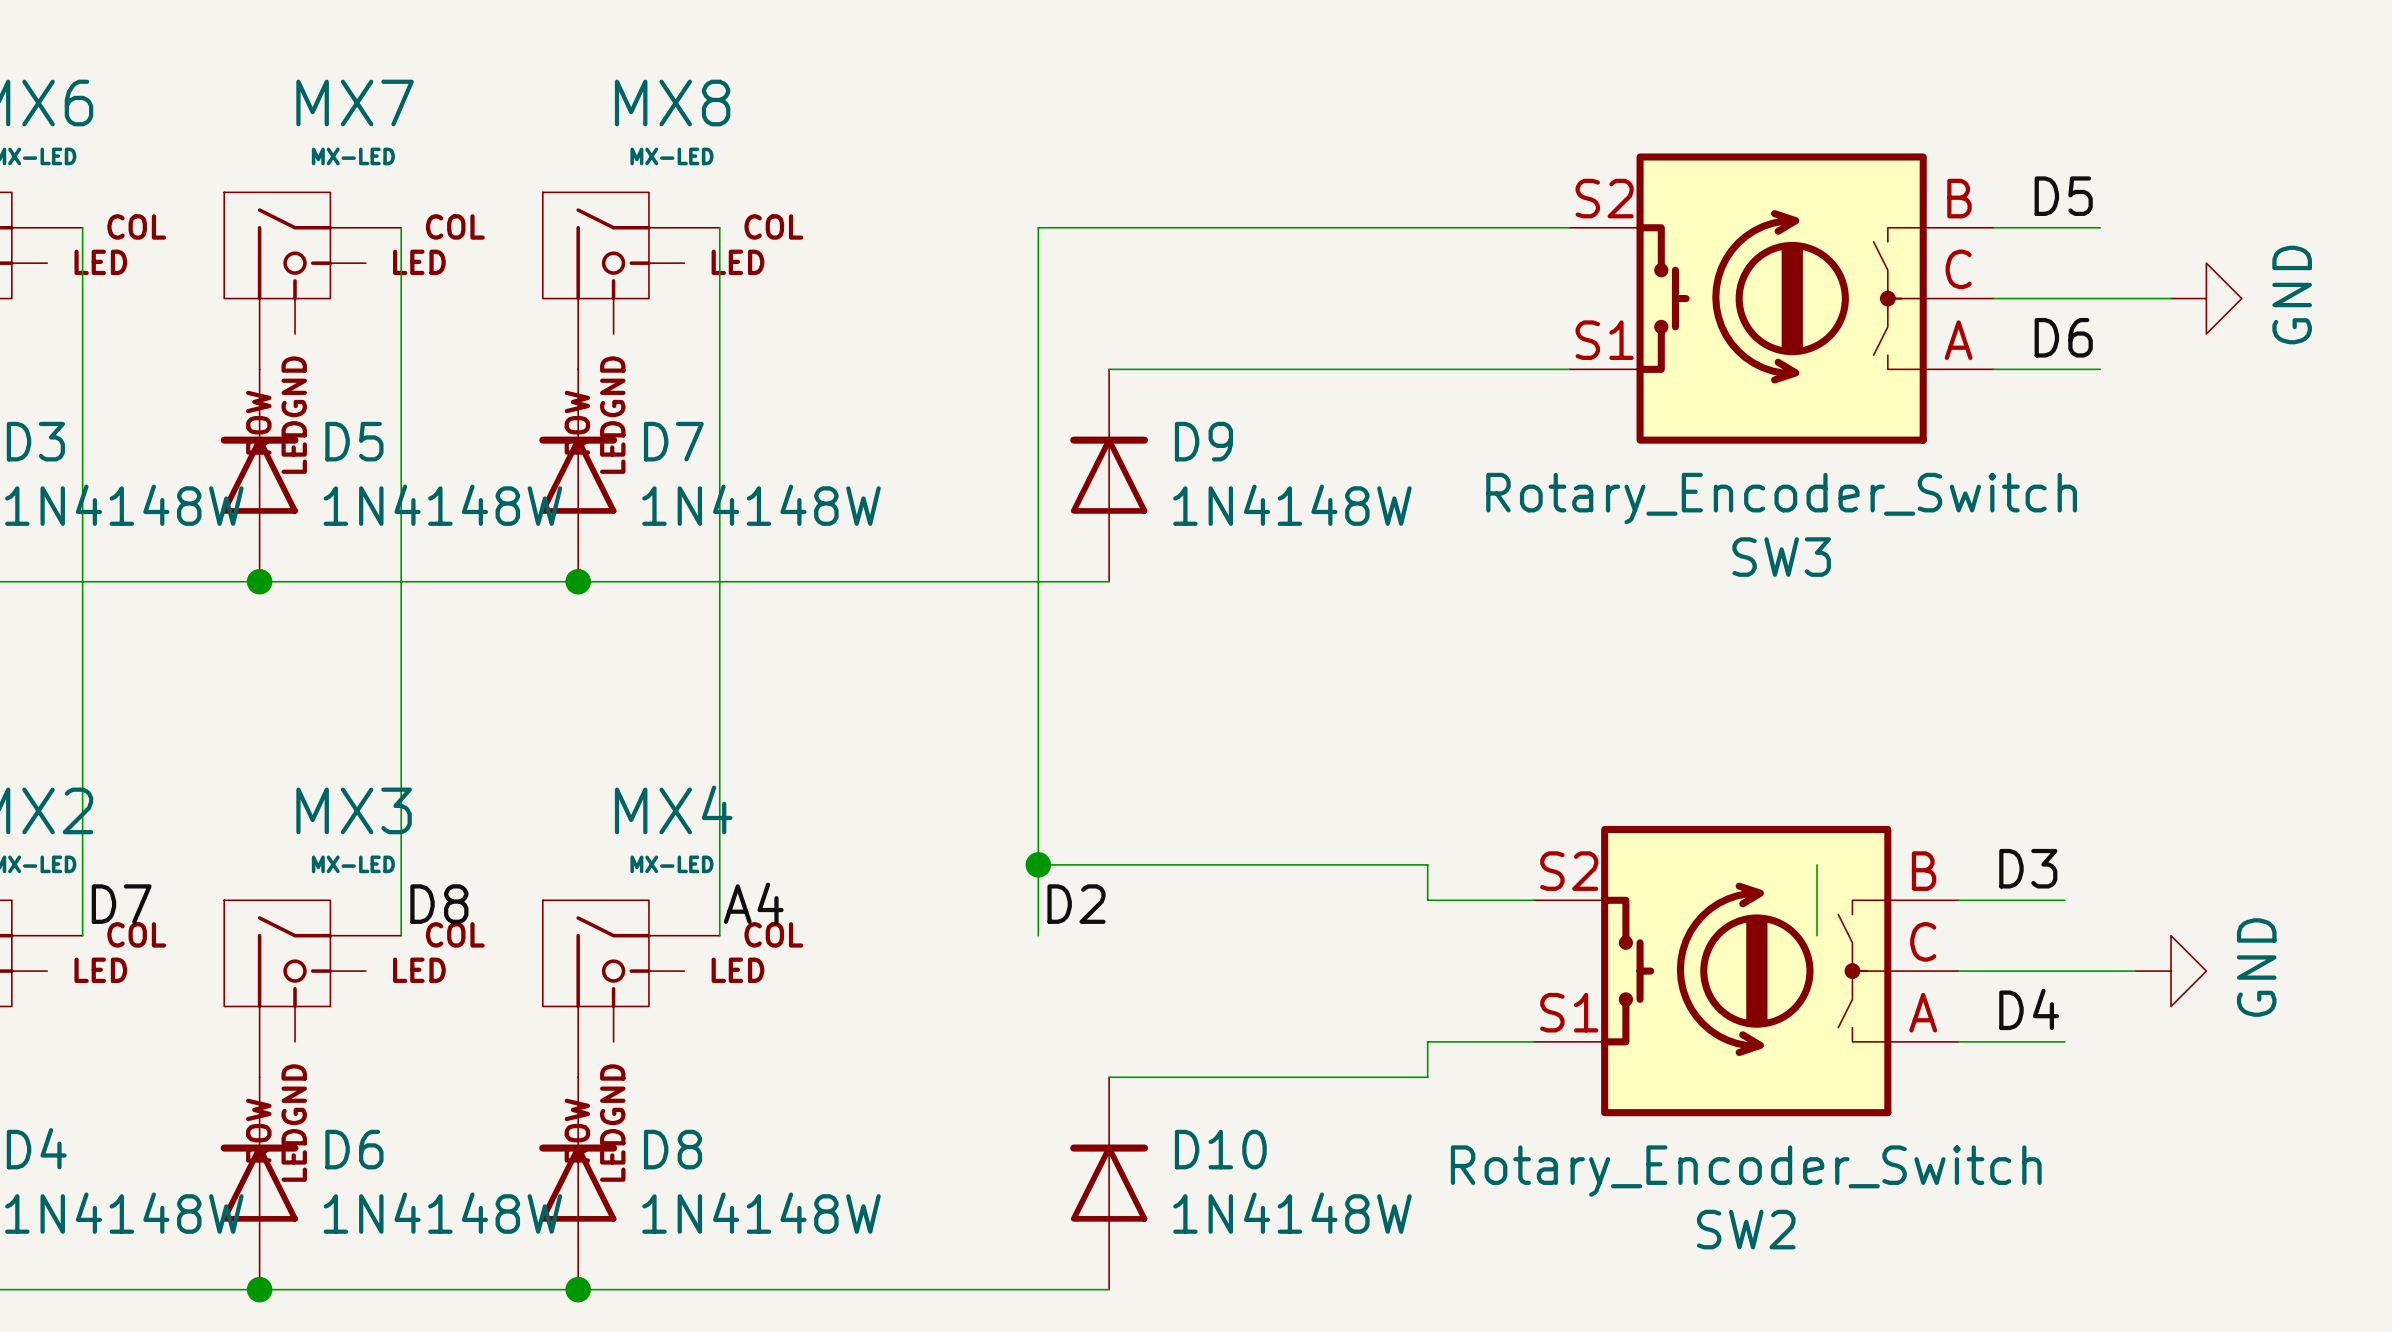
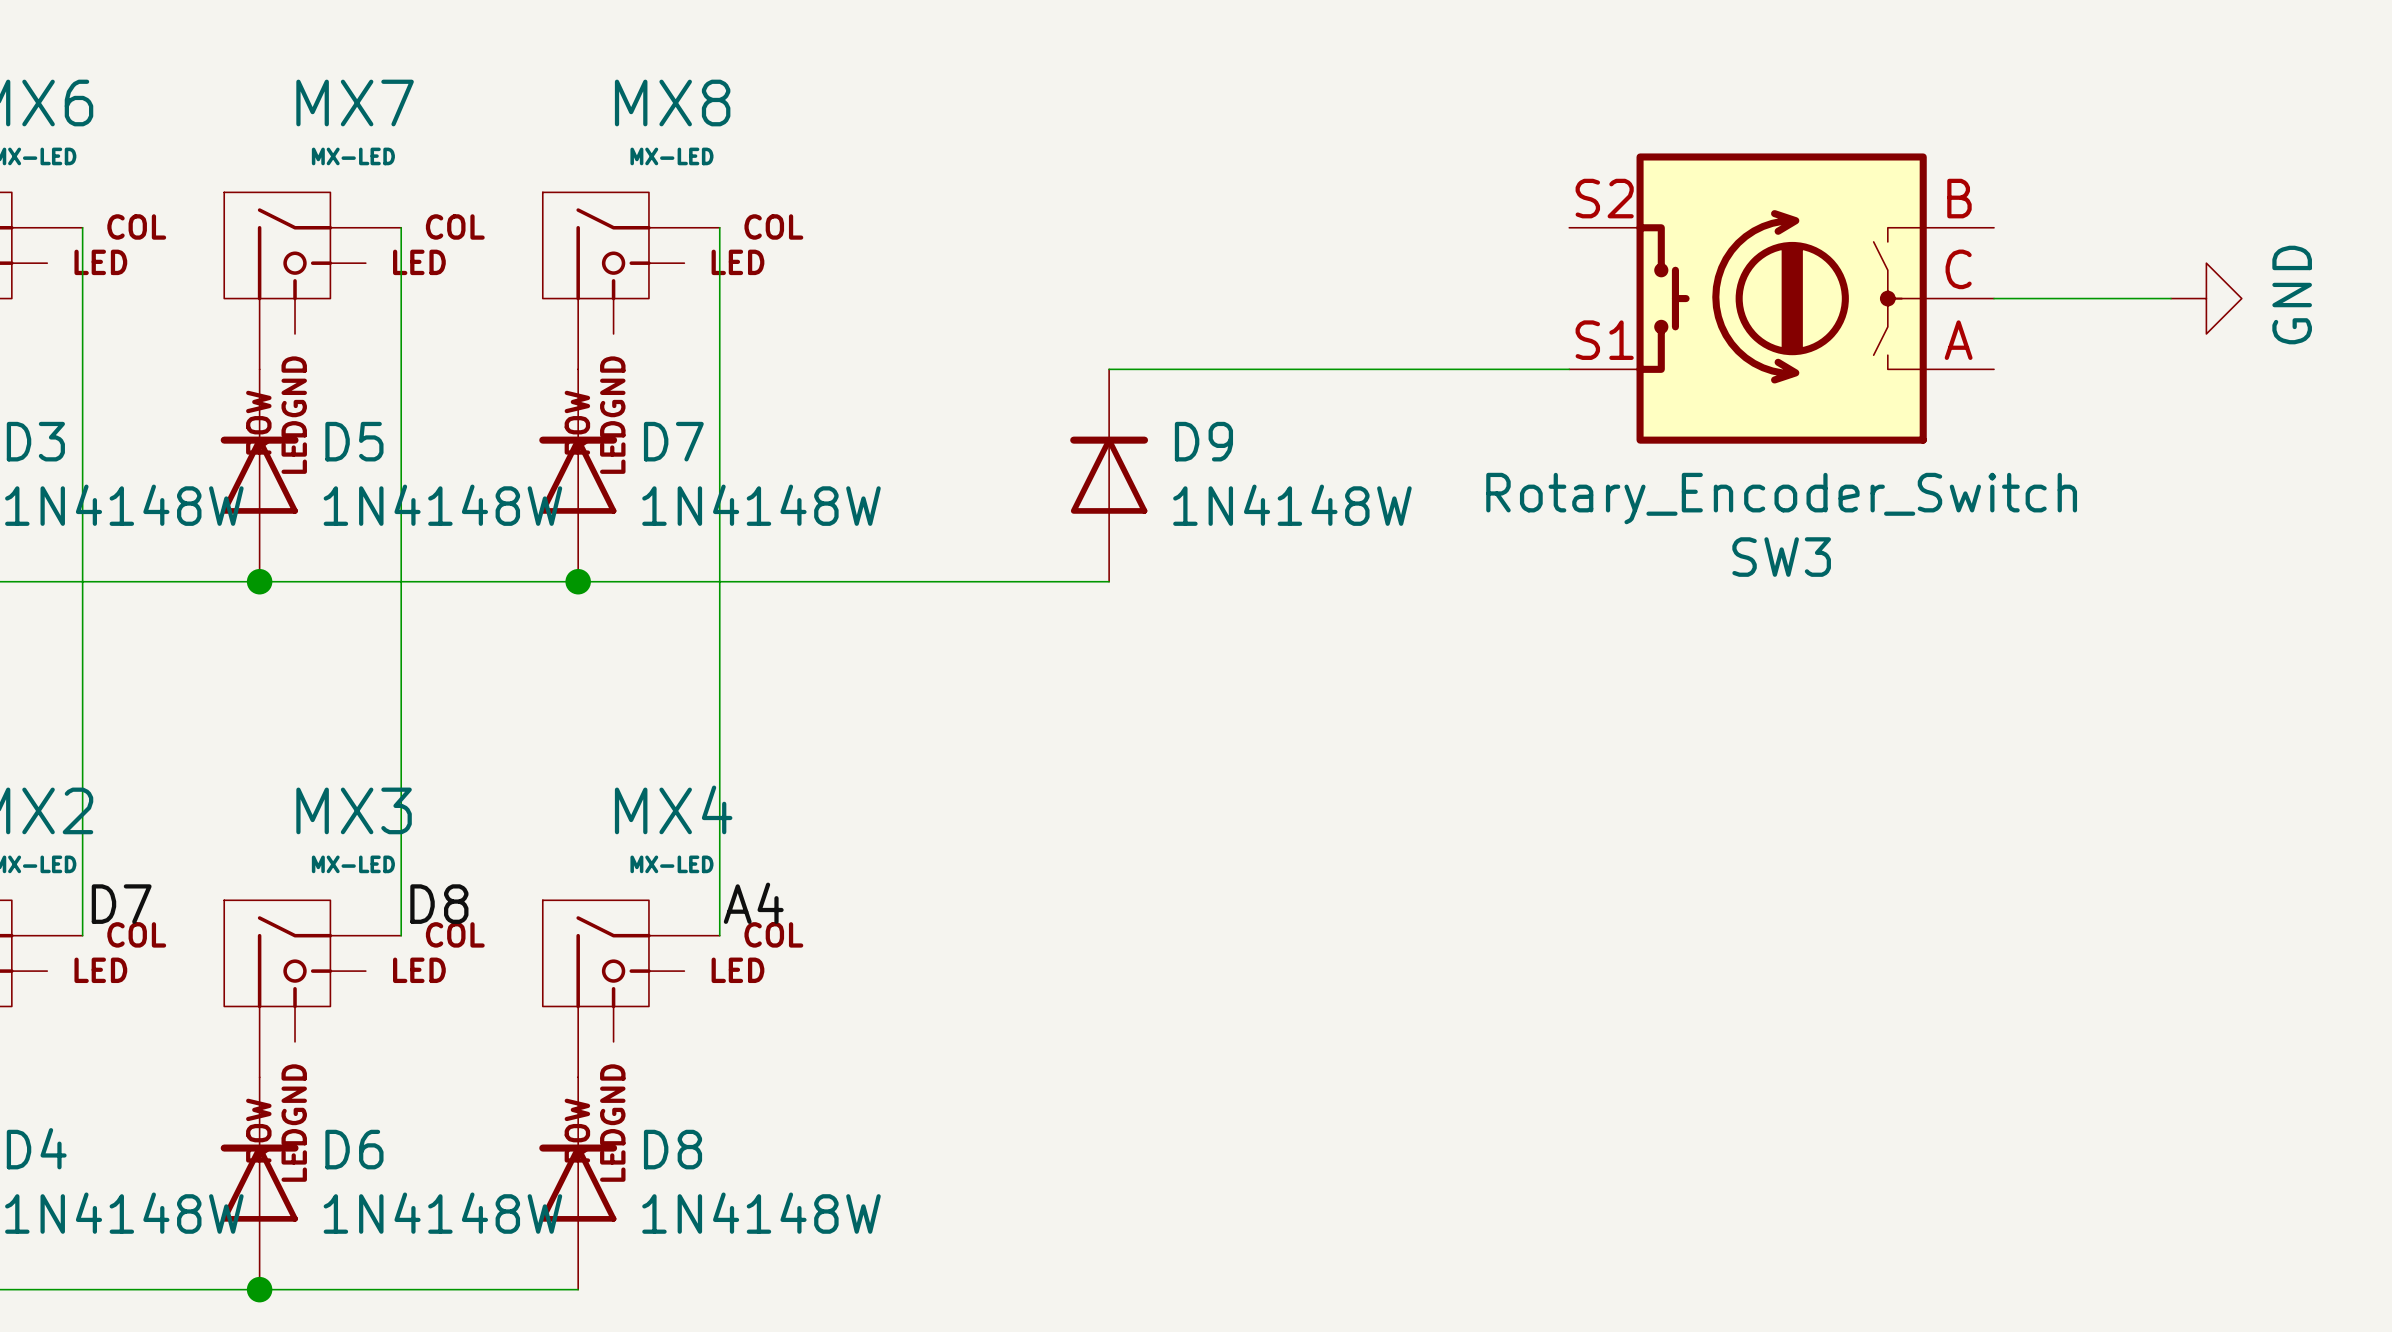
label: D5 (2063, 196) -> none
wire: (1569, 227) (1038, 227) (1038, 935) -> none
wire: (1994, 227) (2100, 227) -> none
label: D6 (2063, 337) -> none
wire: (1994, 369) (2100, 369) -> none
wire: (1038, 864) (1427, 864) (1427, 900) (1533, 900) -> none
junction: (1038, 864) -> none
wire: (1817, 864) (1817, 935) -> none
label: D3 (2028, 868) -> none
wire: (1958, 900) (2064, 900) -> none
label: D2 (1076, 904) -> none
SW2: Rotary_Encoder_Switch (1746, 971) -> none
wire: (1958, 971) (2135, 971) -> none
power symbol: GND (2170, 971) -> none
label: D4 (2029, 1009) -> none
wire: (1533, 1041) (1427, 1041) (1427, 1077) (1109, 1077) -> none
wire: (1958, 1041) (2064, 1041) -> none
D10: 1N4148W (1109, 1183) -> none
wire: (578, 1289) (1109, 1289) -> none
junction: (578, 1289) -> none

